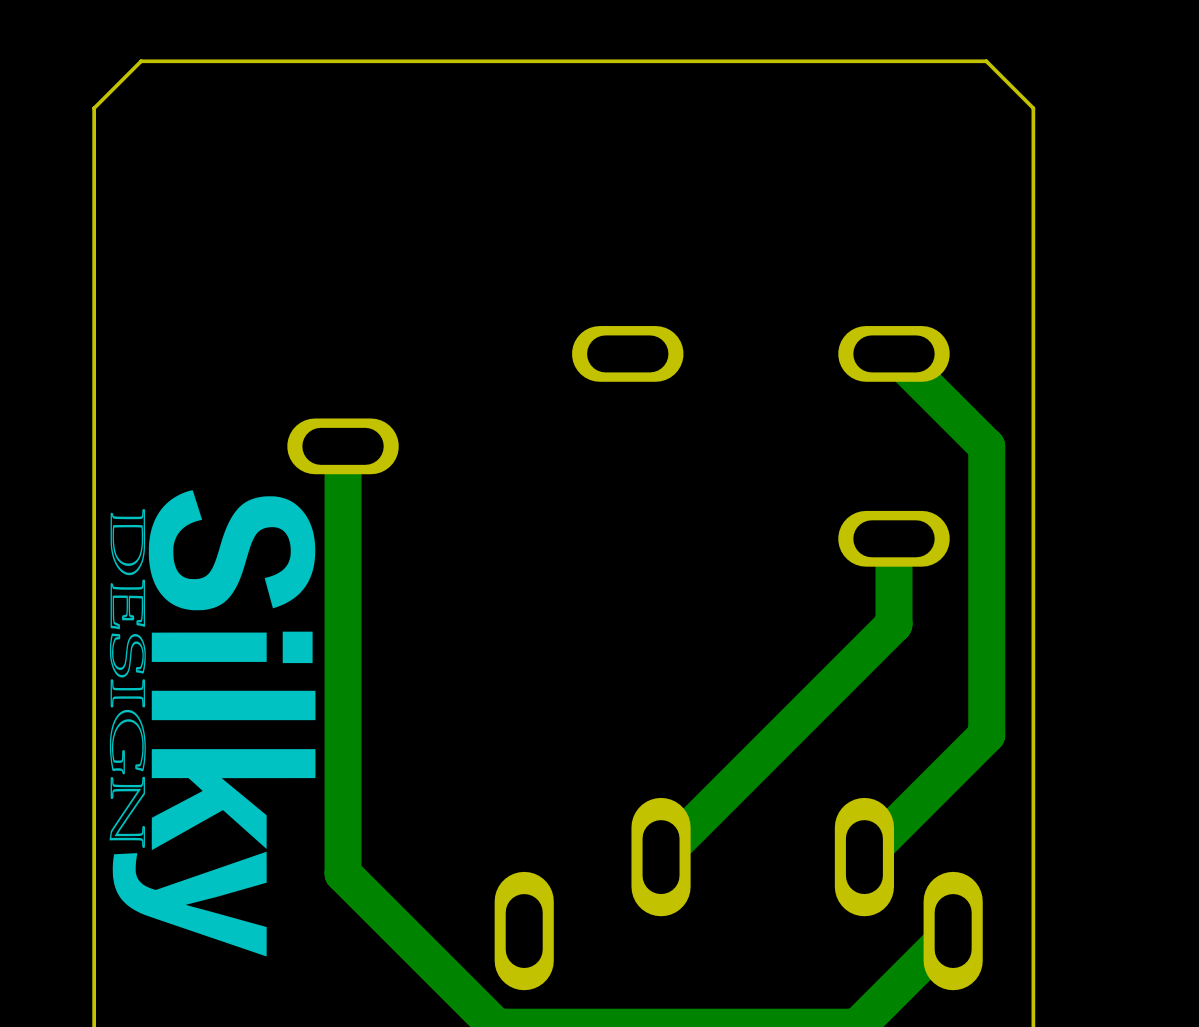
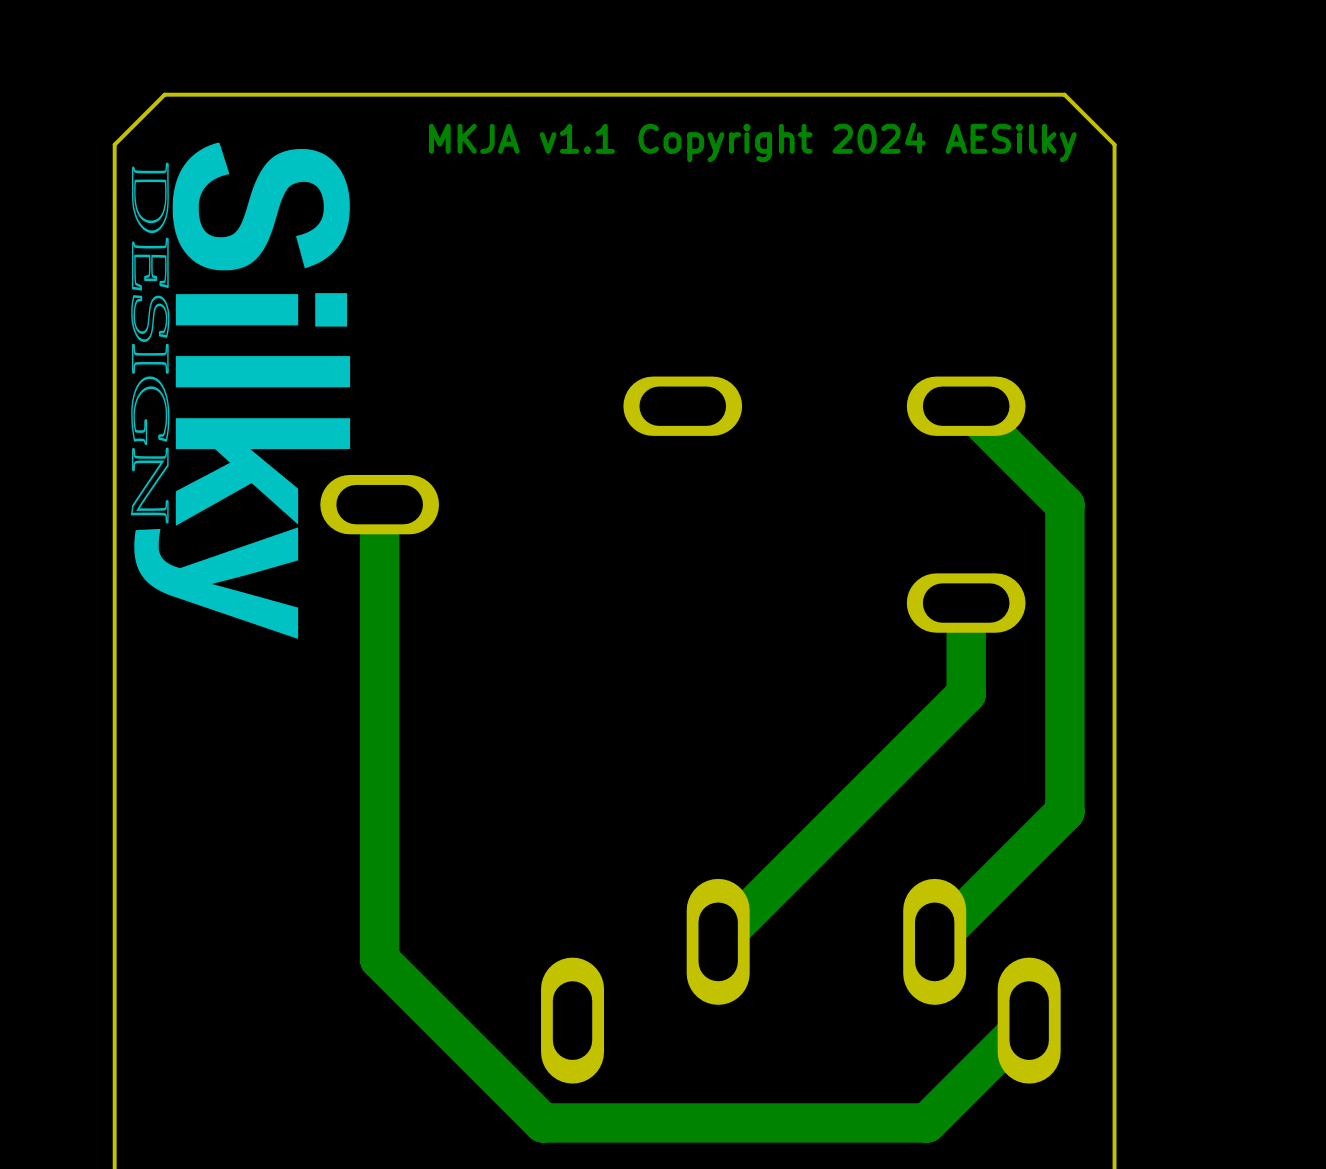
text: none -> MKJA v1.1 Copyright 2024 AESilky (752, 142)
drawing position: (212, 723) -> (240, 390)

